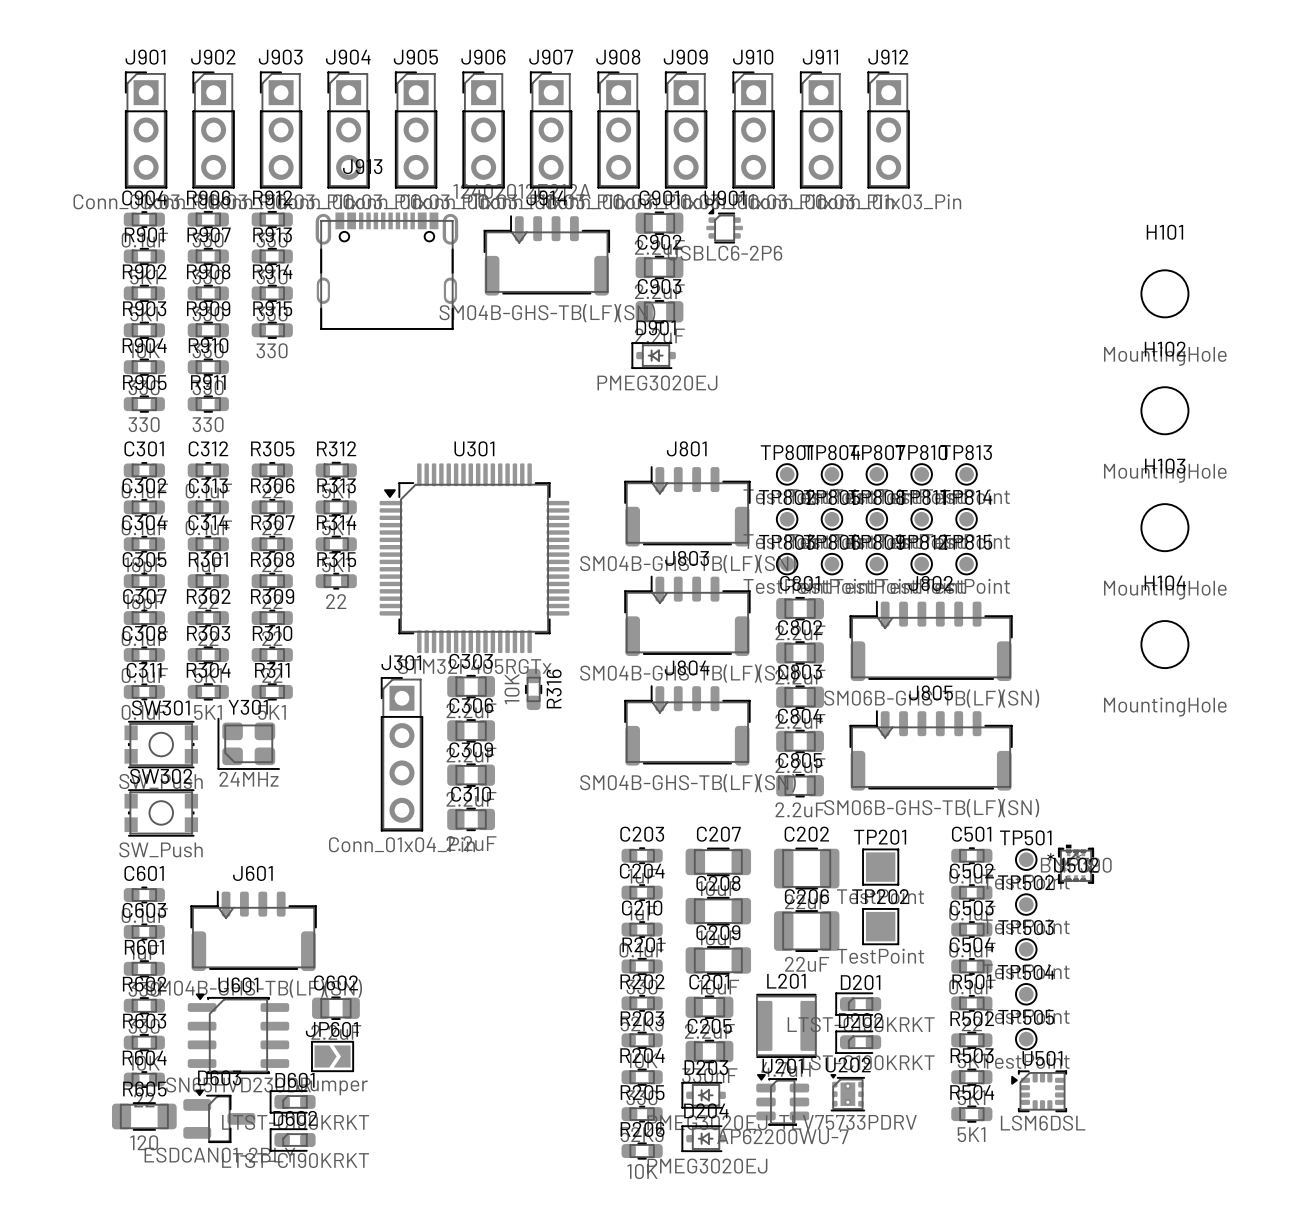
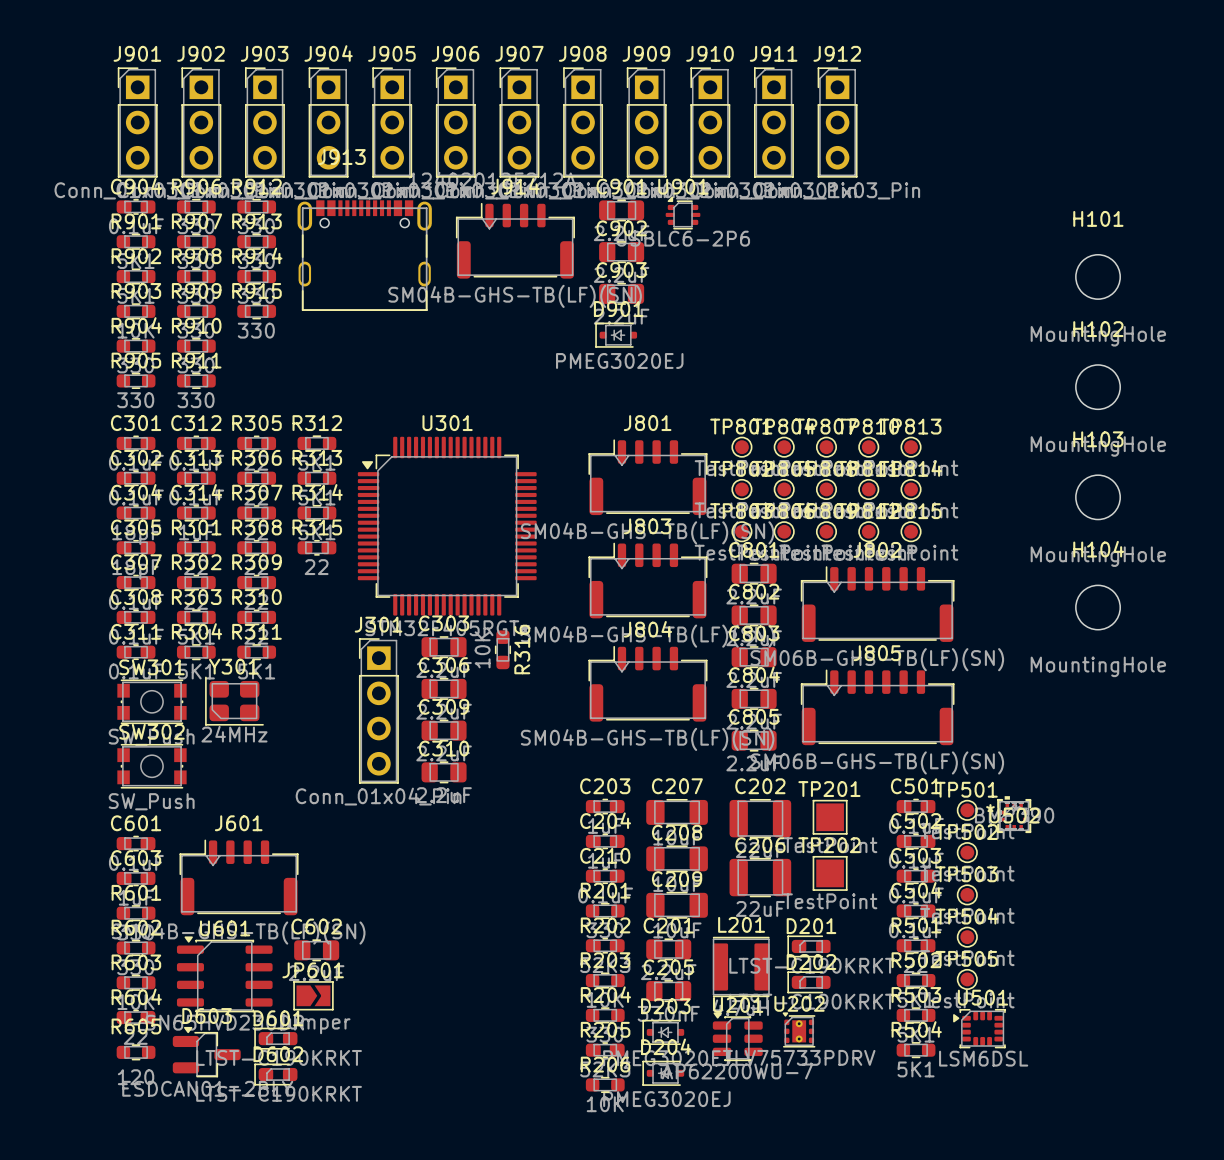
R605 footprint: [111, 1102, 177, 1131] -> [116, 1044, 156, 1061]

